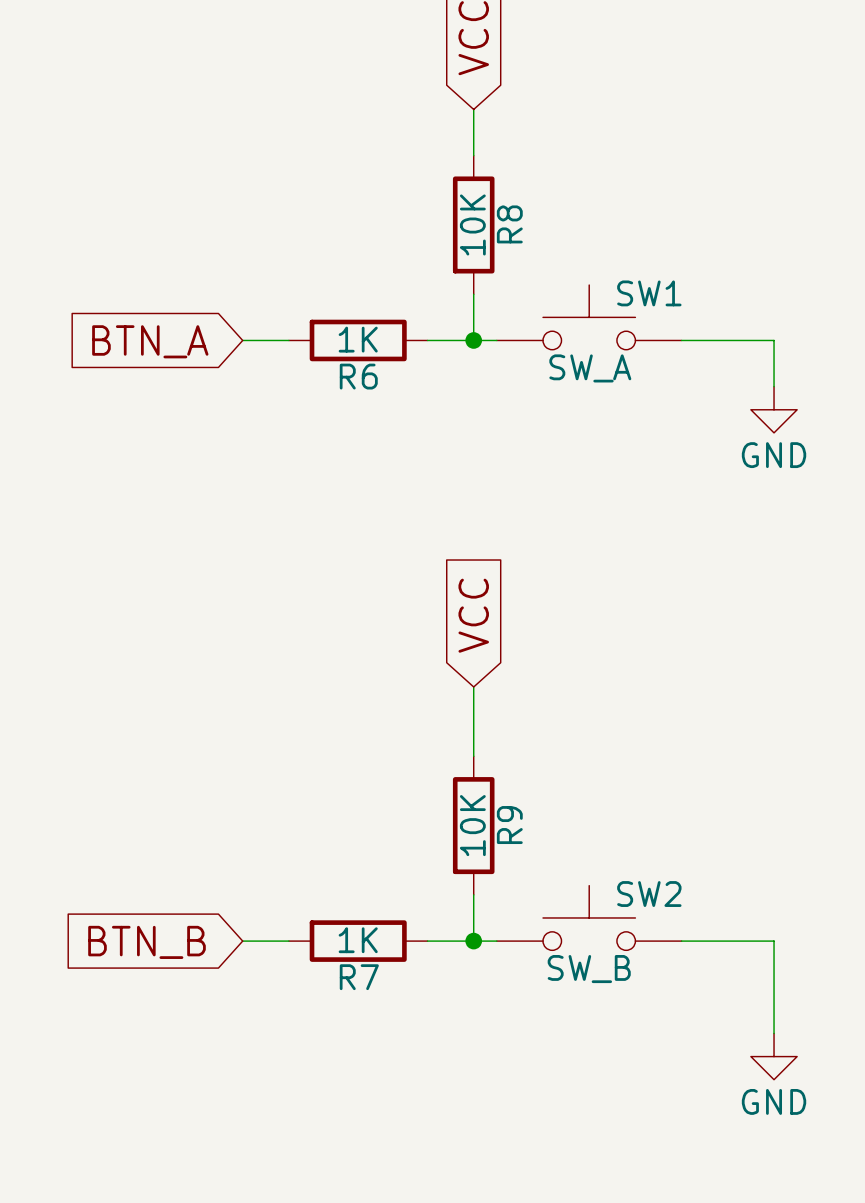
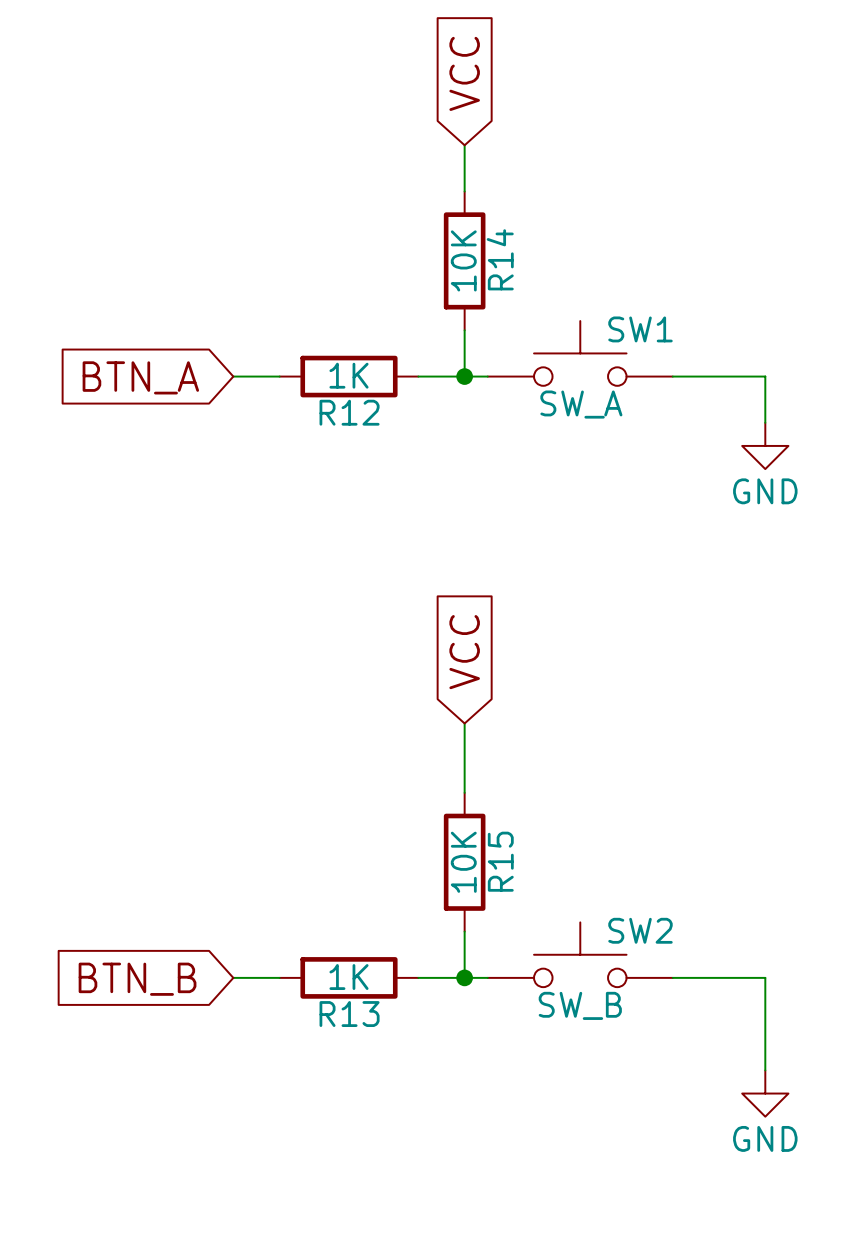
R8 name: R8 (509, 224) -> R14 (500, 259)
R6 name: R6 (358, 376) -> R12 (349, 412)
R9 name: R9 (509, 825) -> R15 (500, 861)
R7 name: R7 (359, 977) -> R13 (349, 1014)

